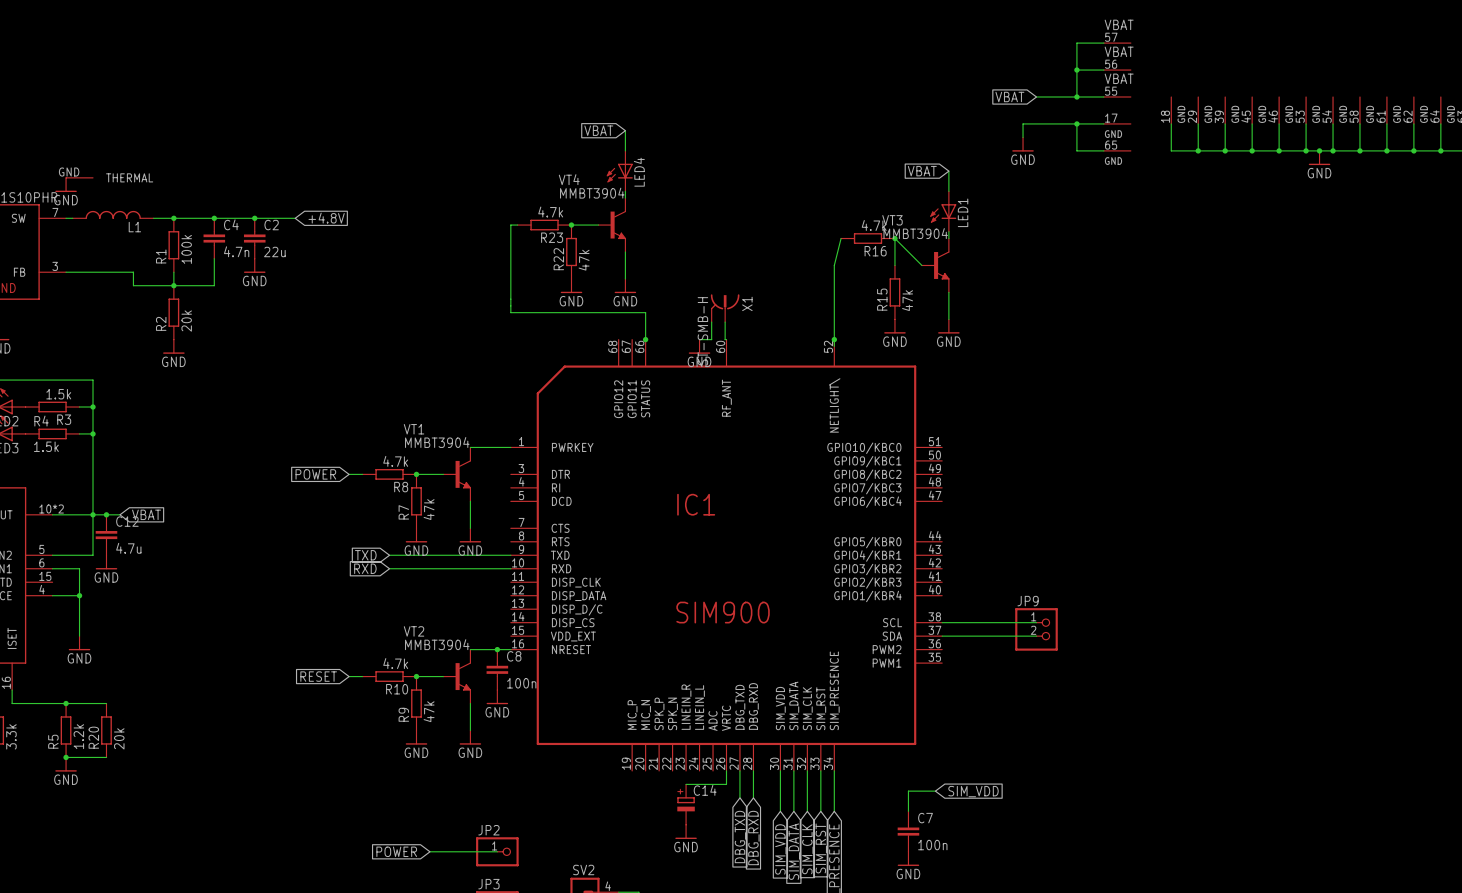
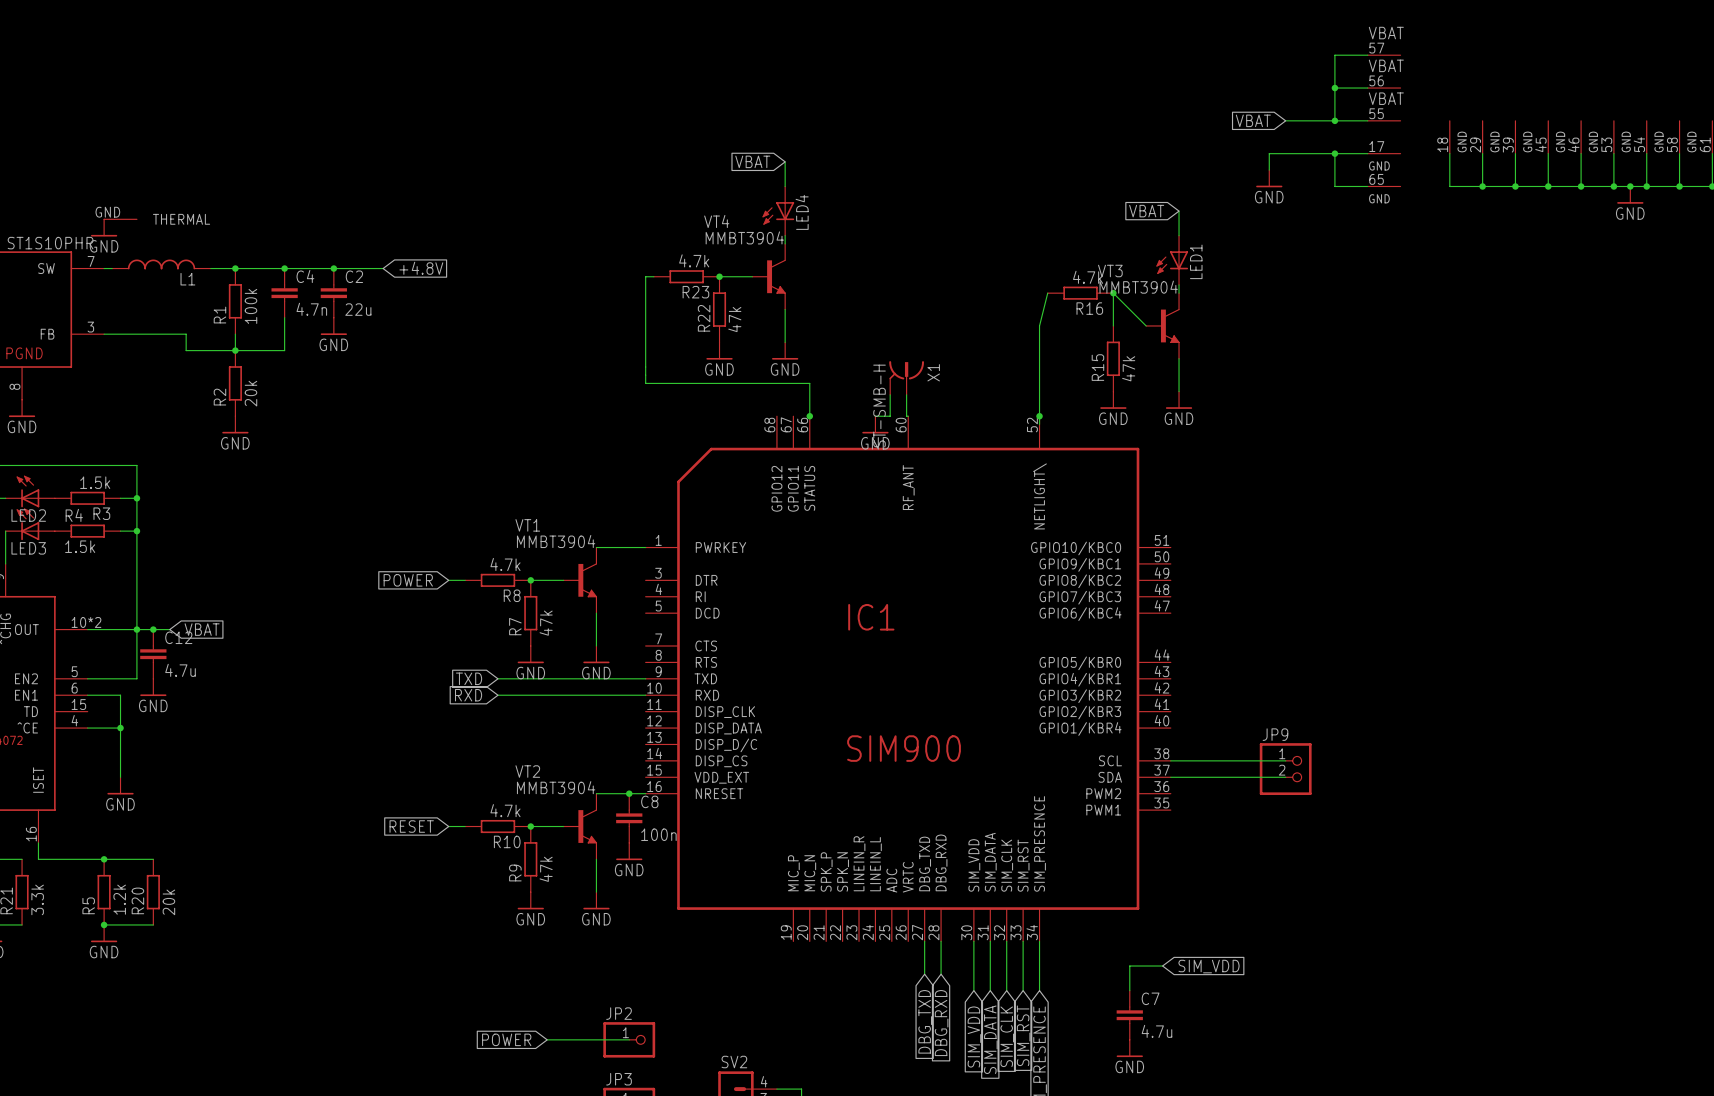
wire: (726, 770) (726, 784) (686, 784) -> none
C14: (686, 804) -> none
power symbol: GND (686, 831) -> none
C7 value: 100n (932, 845) -> 4.7u (1156, 1031)

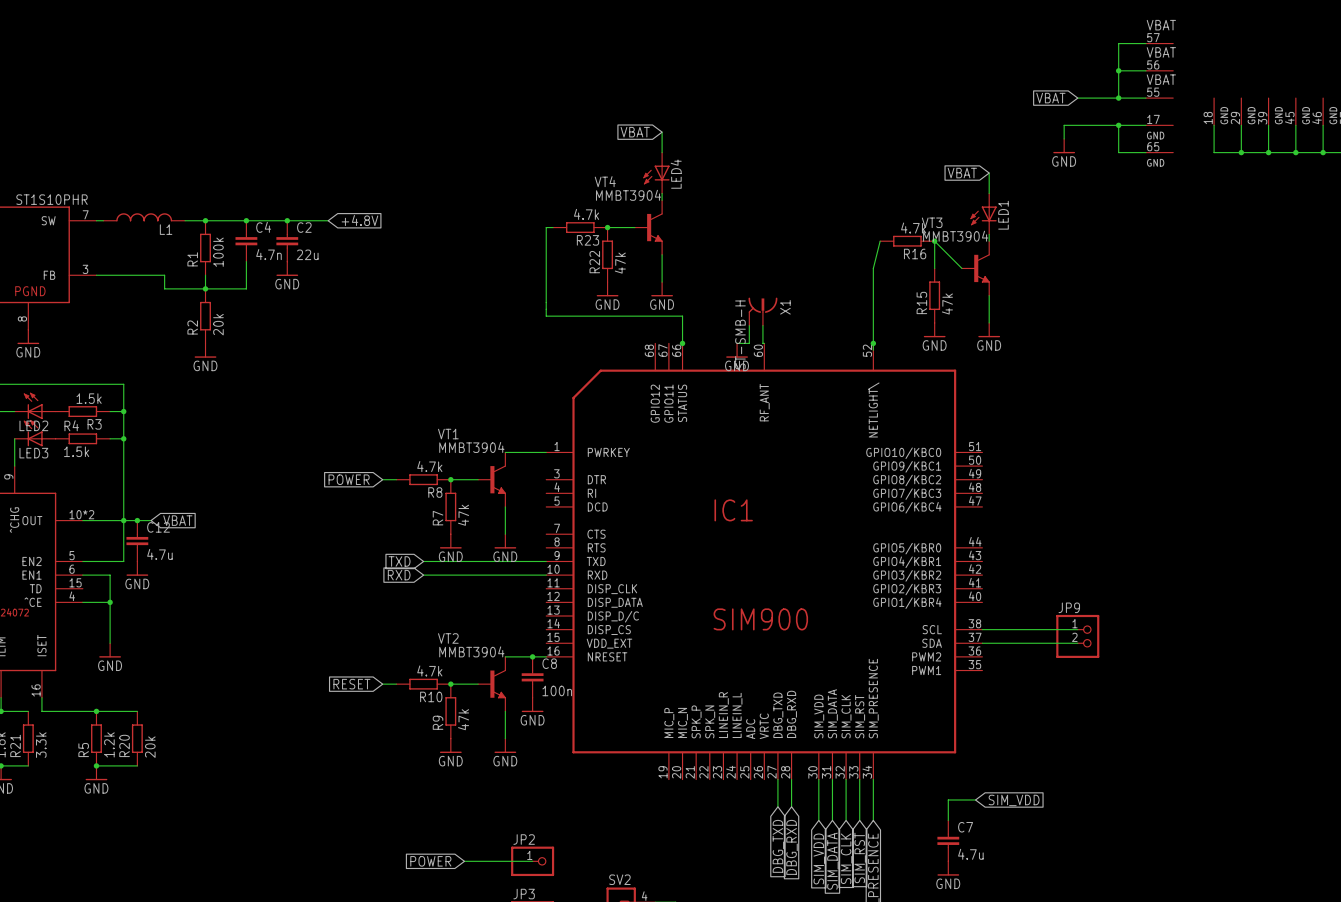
part: (120, 219) -> none
power symbol: GND (104, 227) -> none

